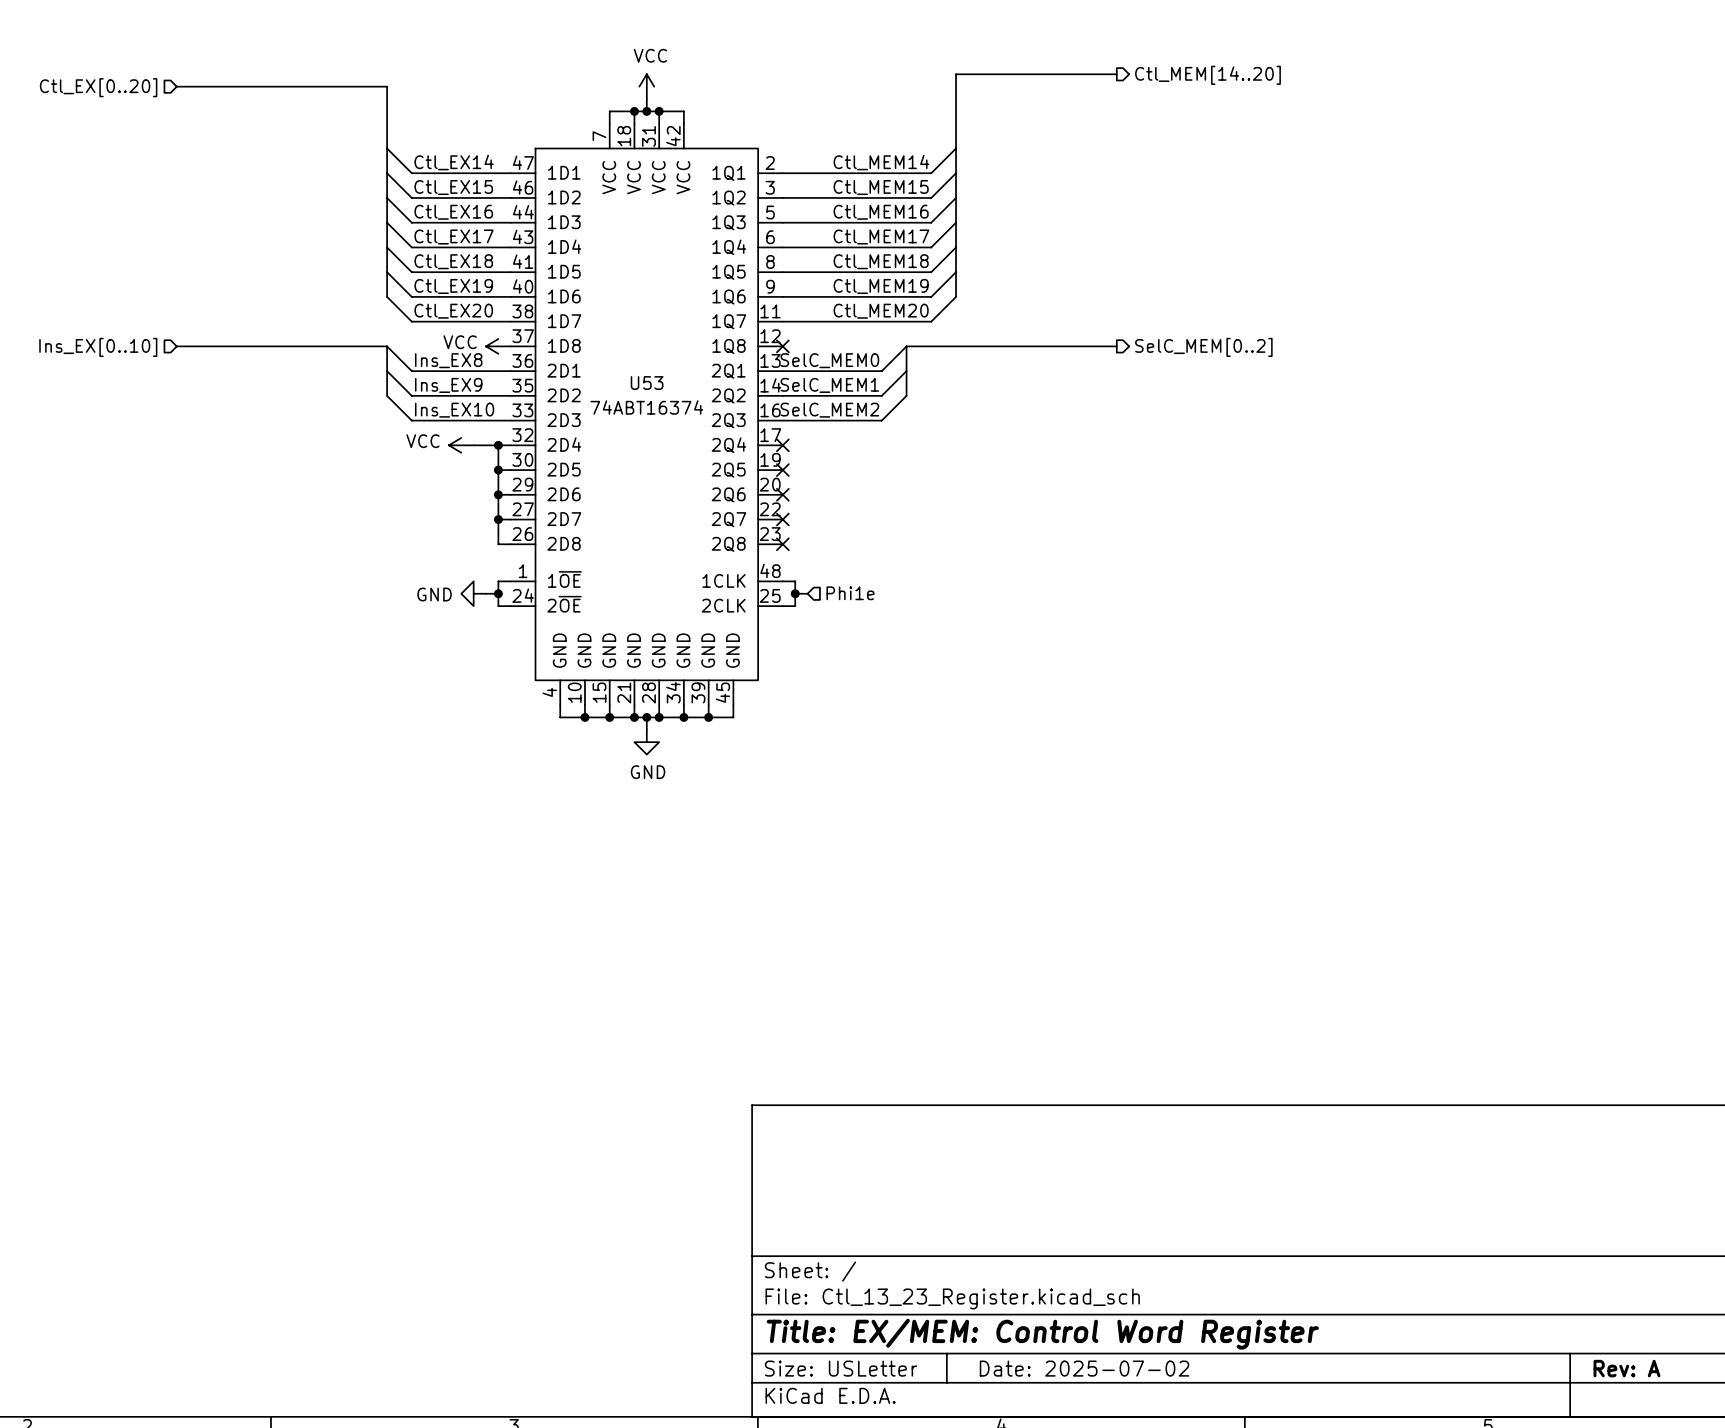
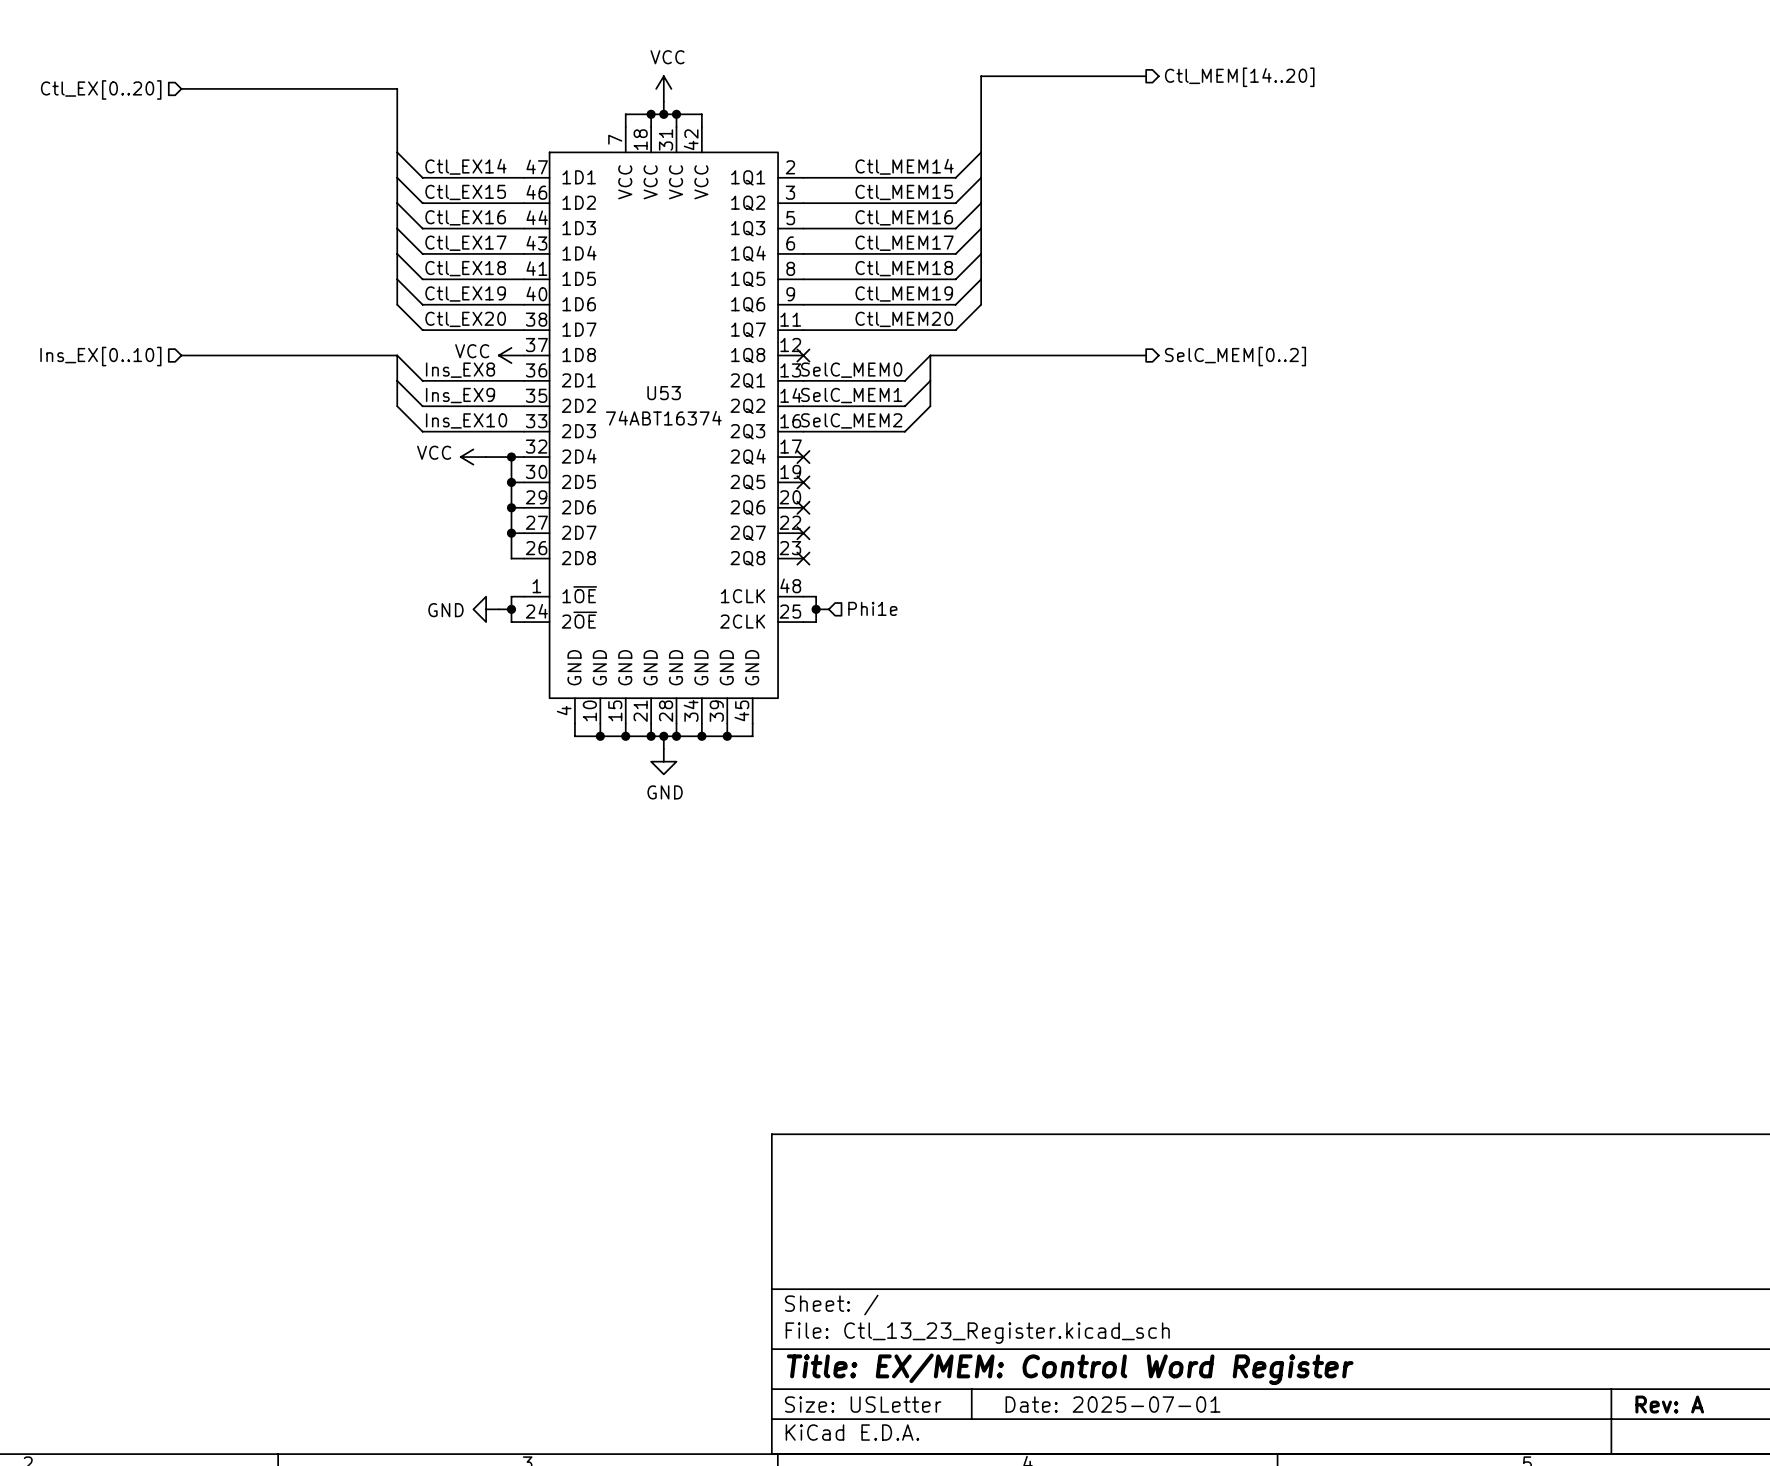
title block: Date: 2025-07-02 (1084, 1368) -> Date: 2025-07-01 (1113, 1404)

